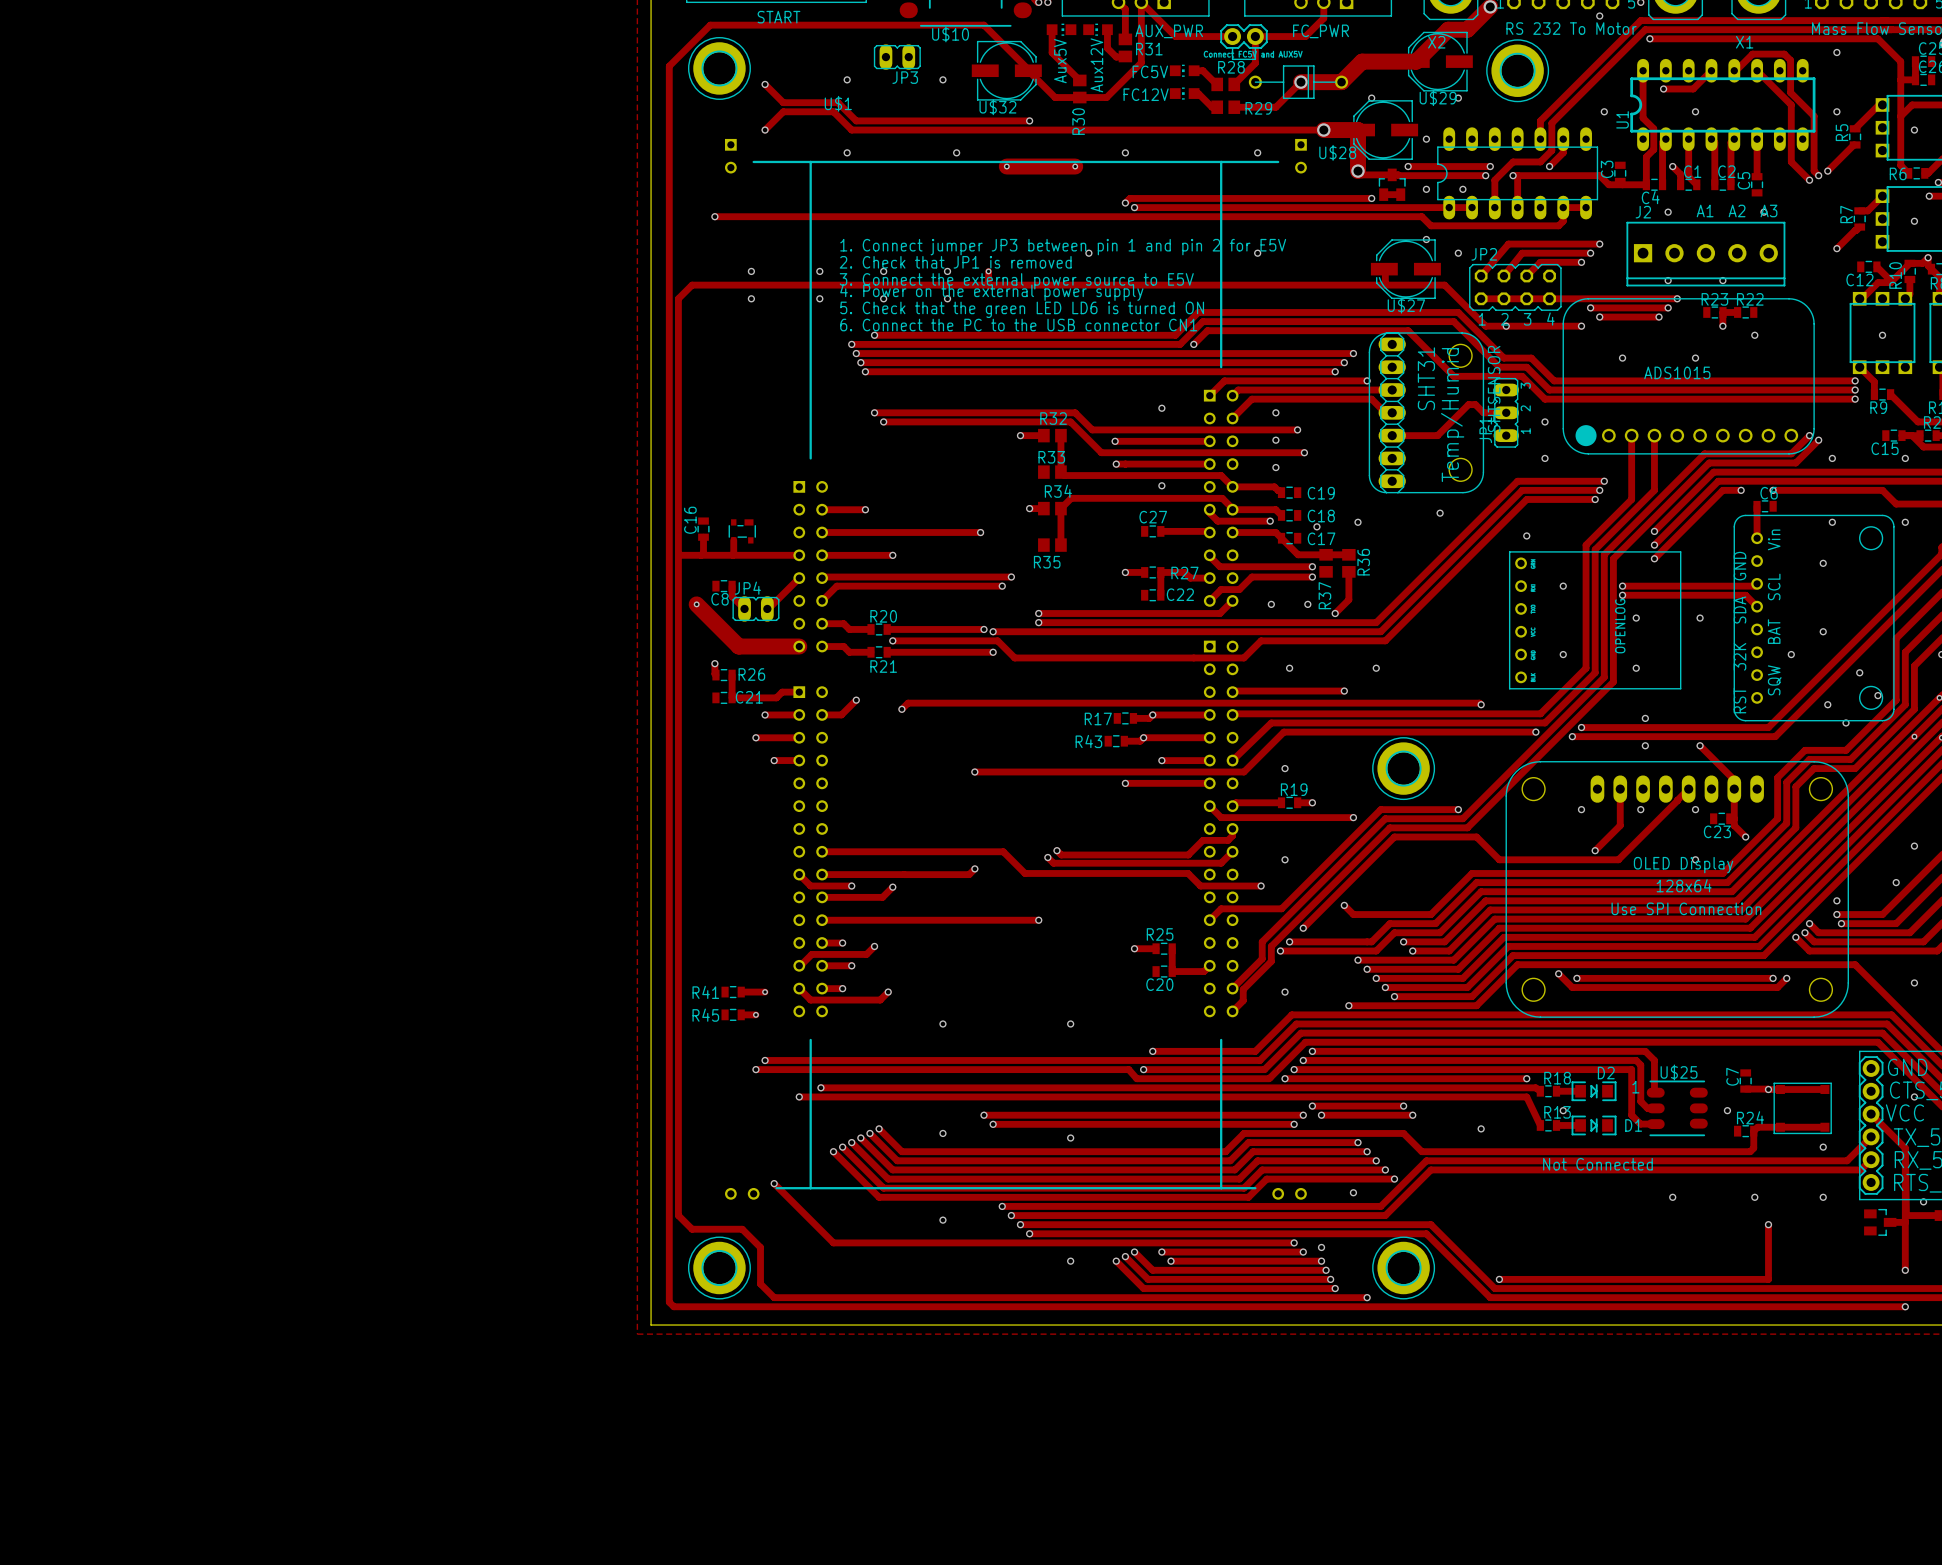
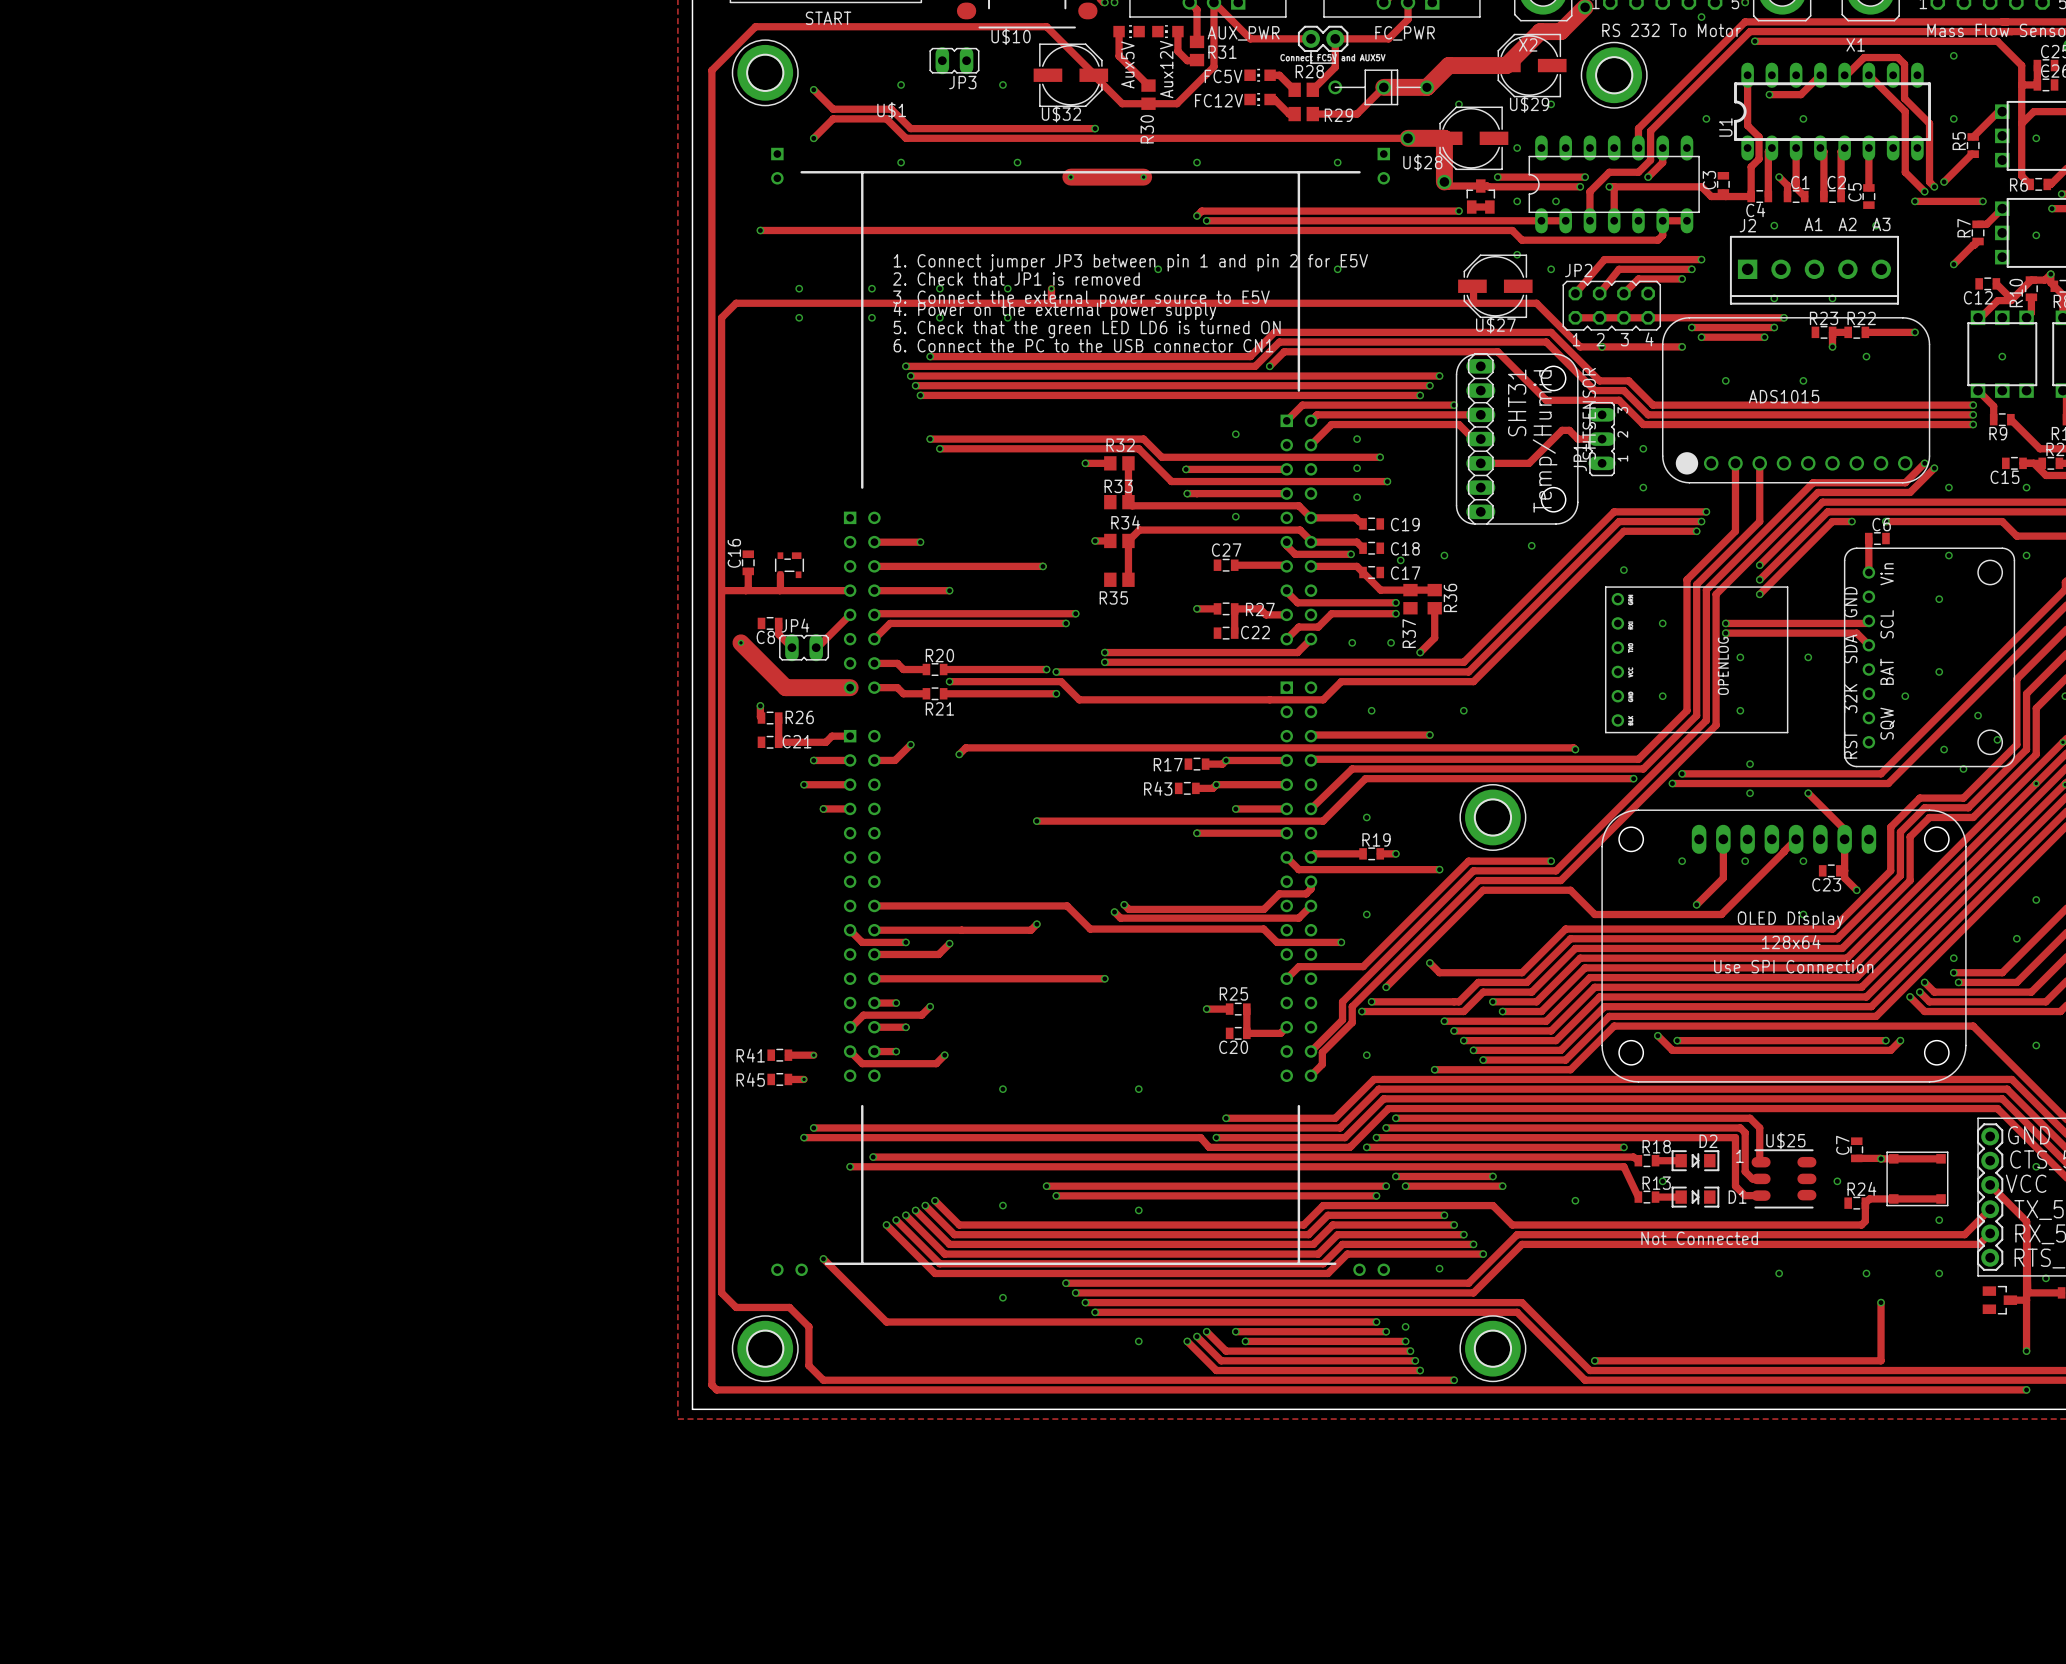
track: none -> (1914, 201) (1982, 201)
via: none -> (1914, 201)
via: none -> (1982, 201)
track: none -> (1865, 332) (1914, 332)
via: none -> (1914, 332)

